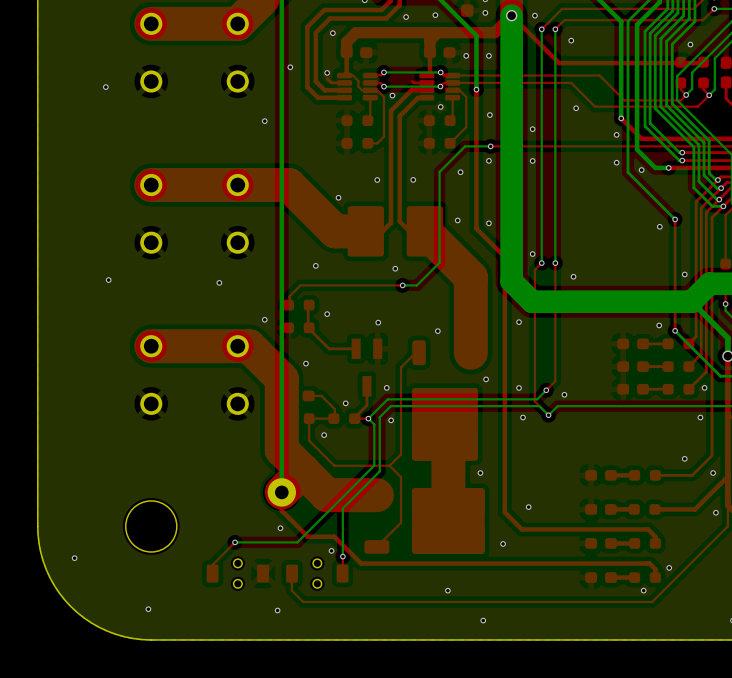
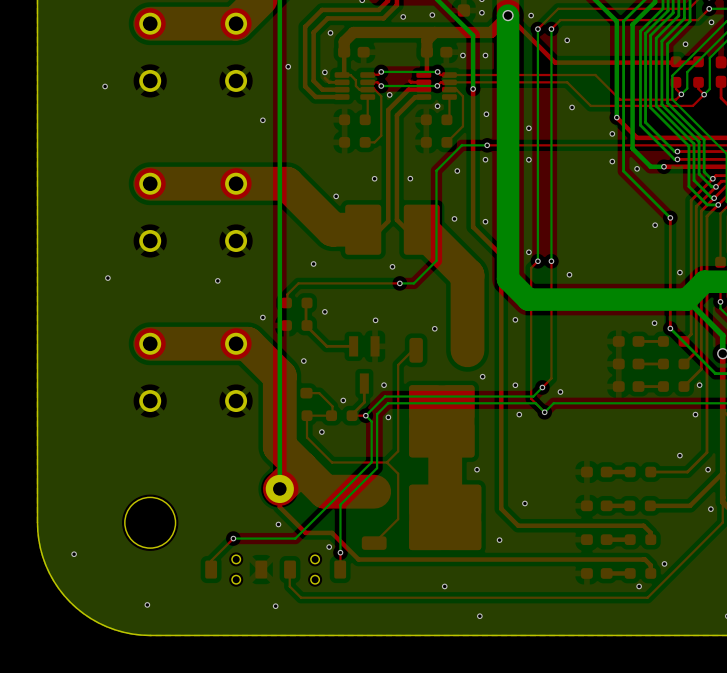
via: none -> (711, 22)

